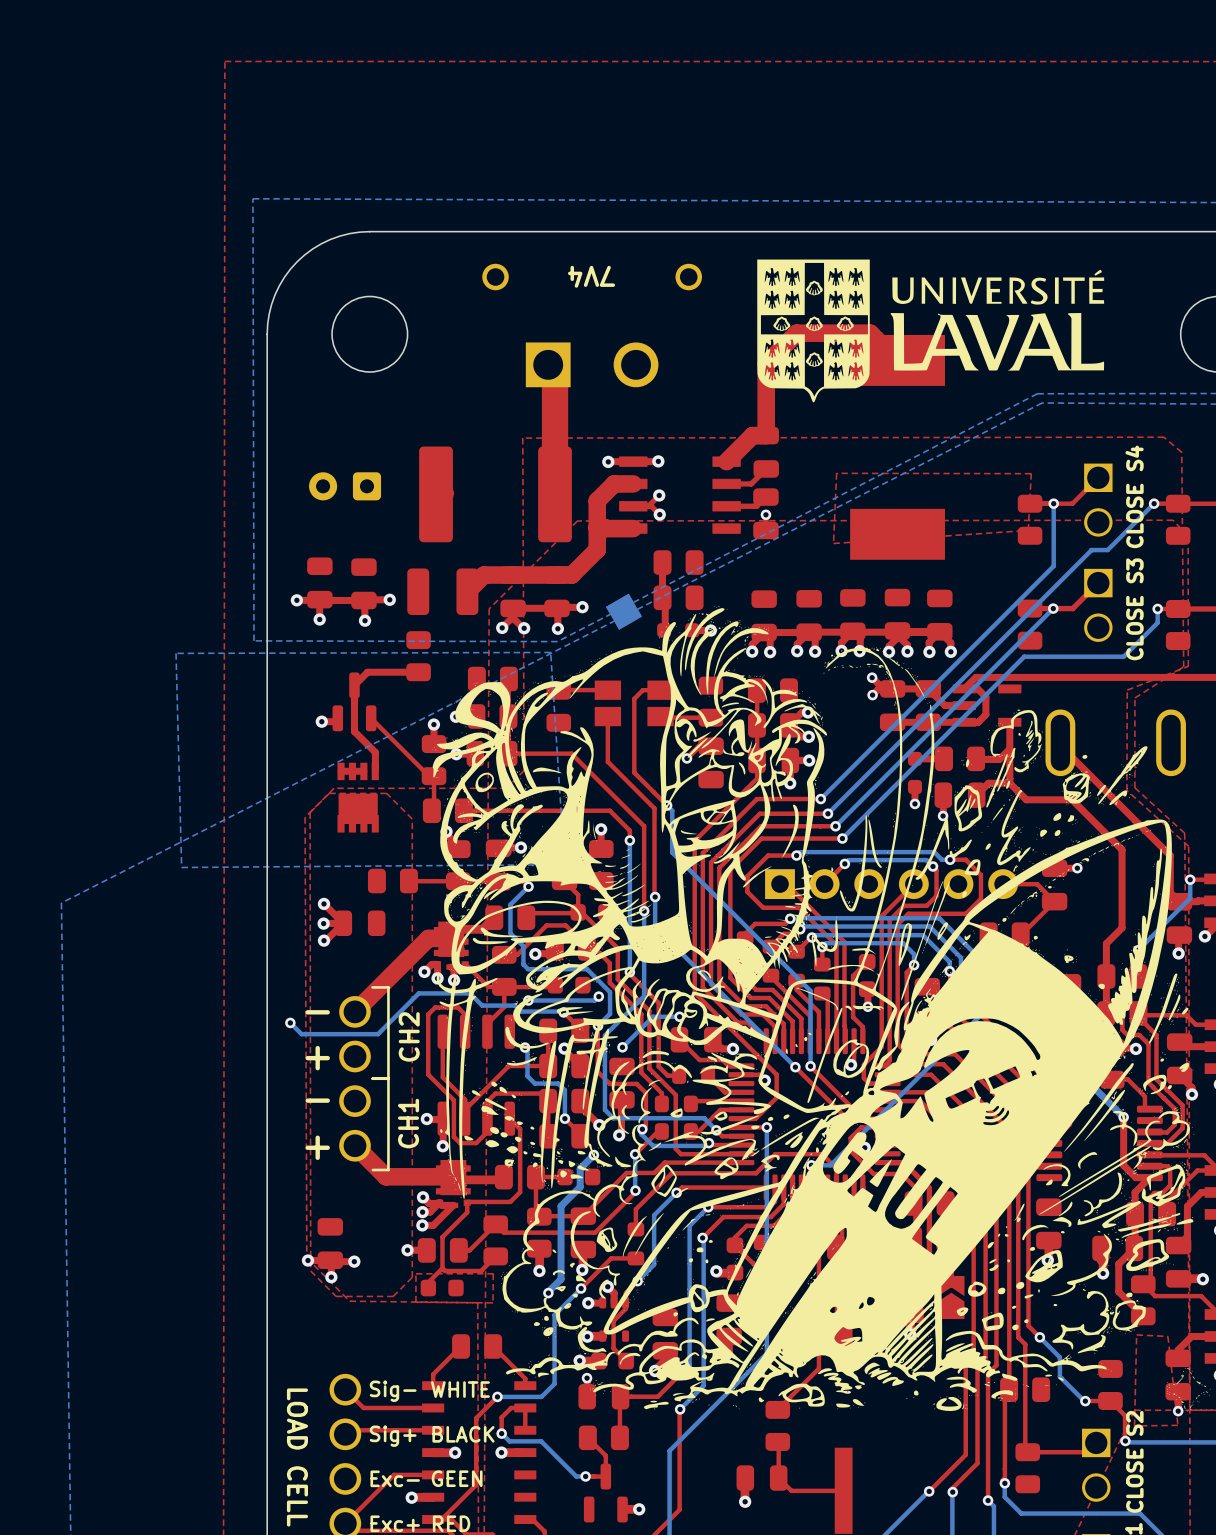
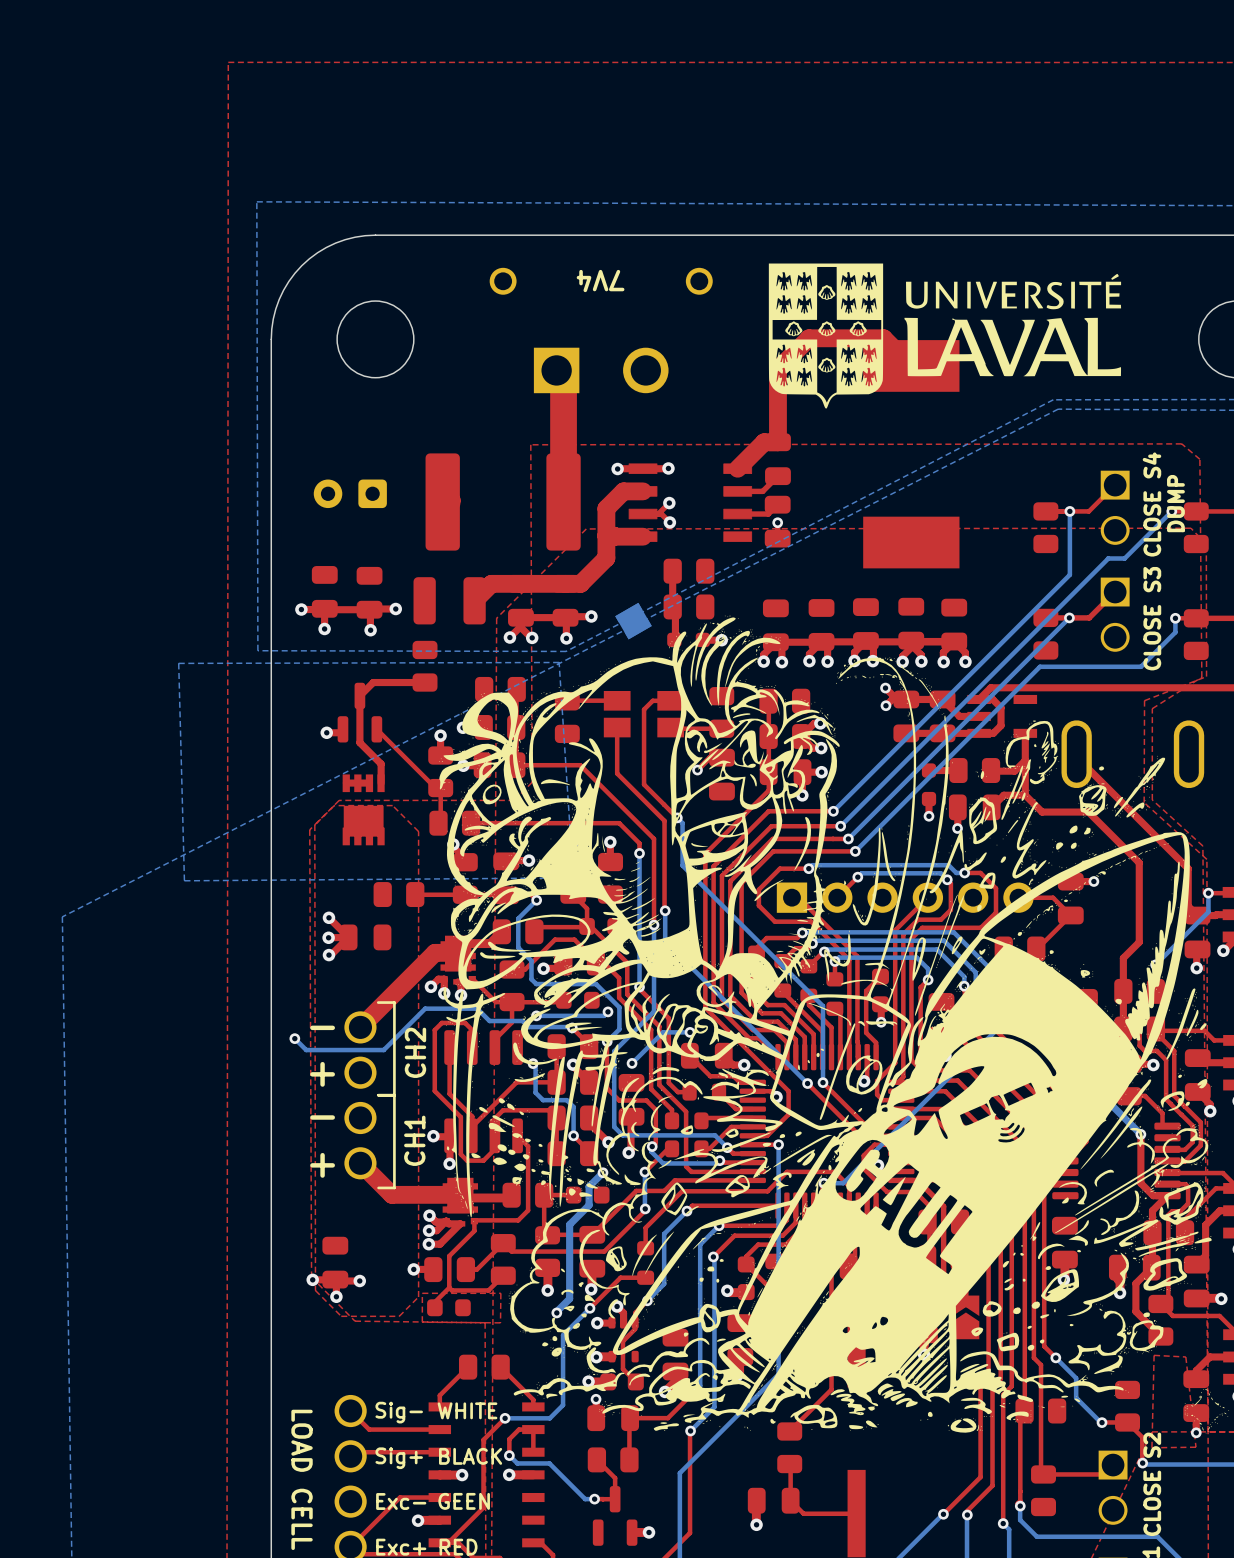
top zone outline: (836, 473) (1031, 473) (1028, 530) (833, 543) (836, 473) -> none
text: none -> DUMP (1175, 503)

